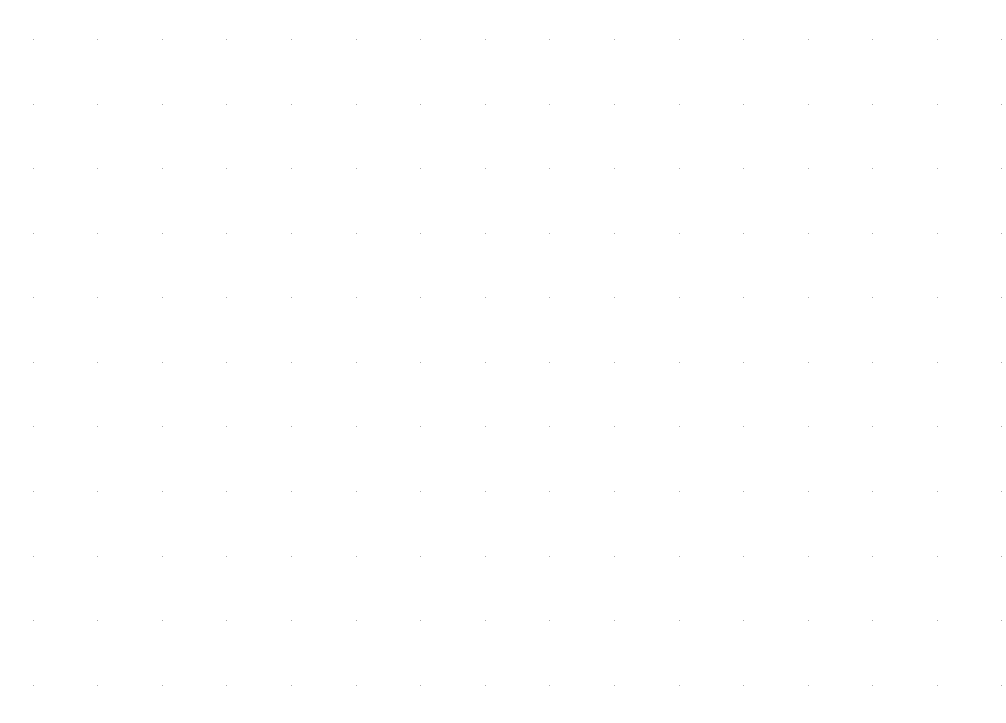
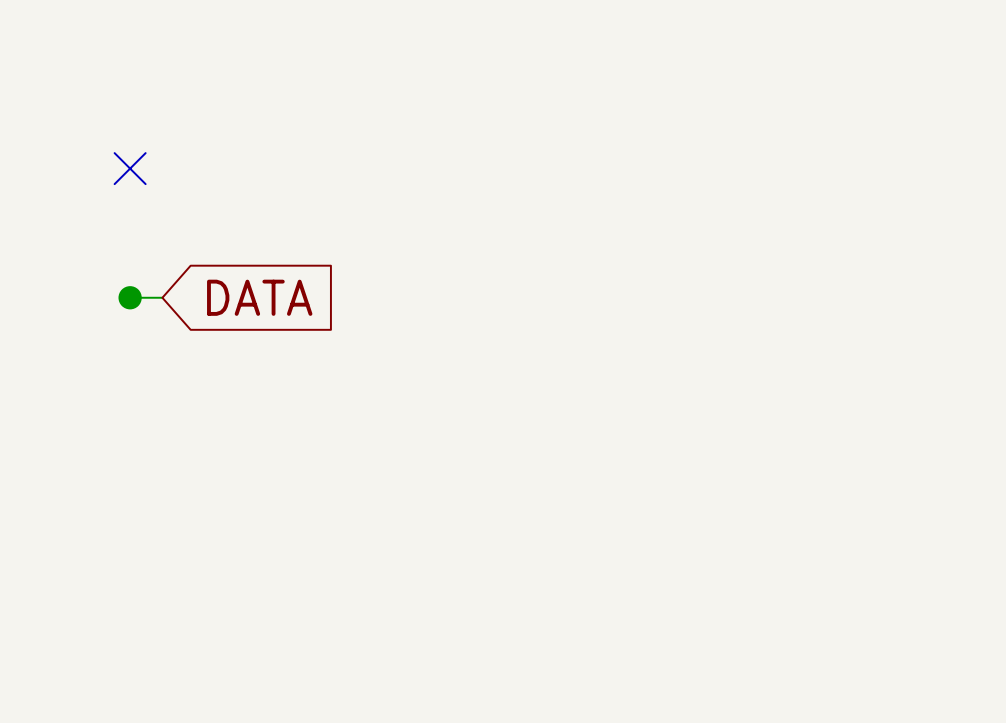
no-connect mark: none -> (130, 168)
wire: none -> (130, 297) (162, 297)
junction: none -> (130, 297)
global label: none -> DATA (259, 297)

